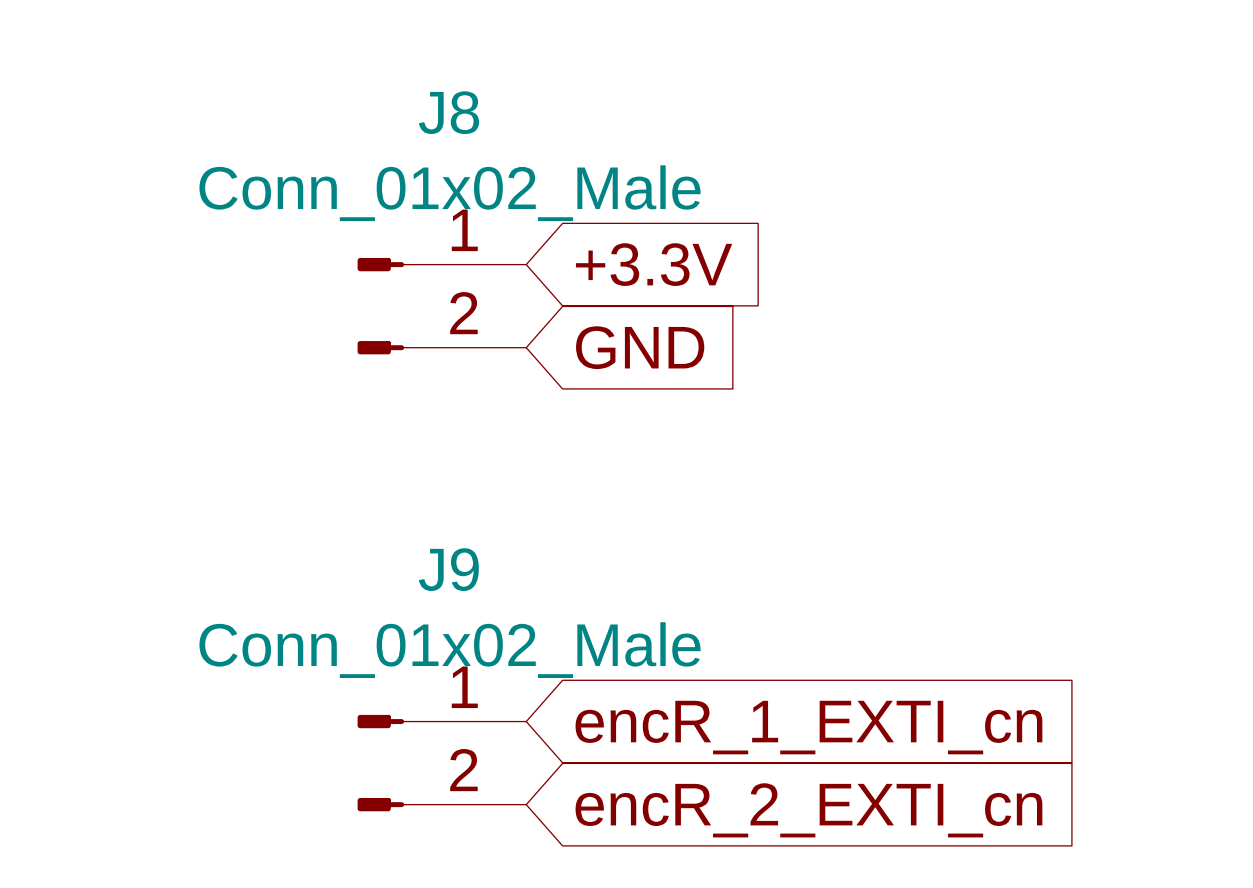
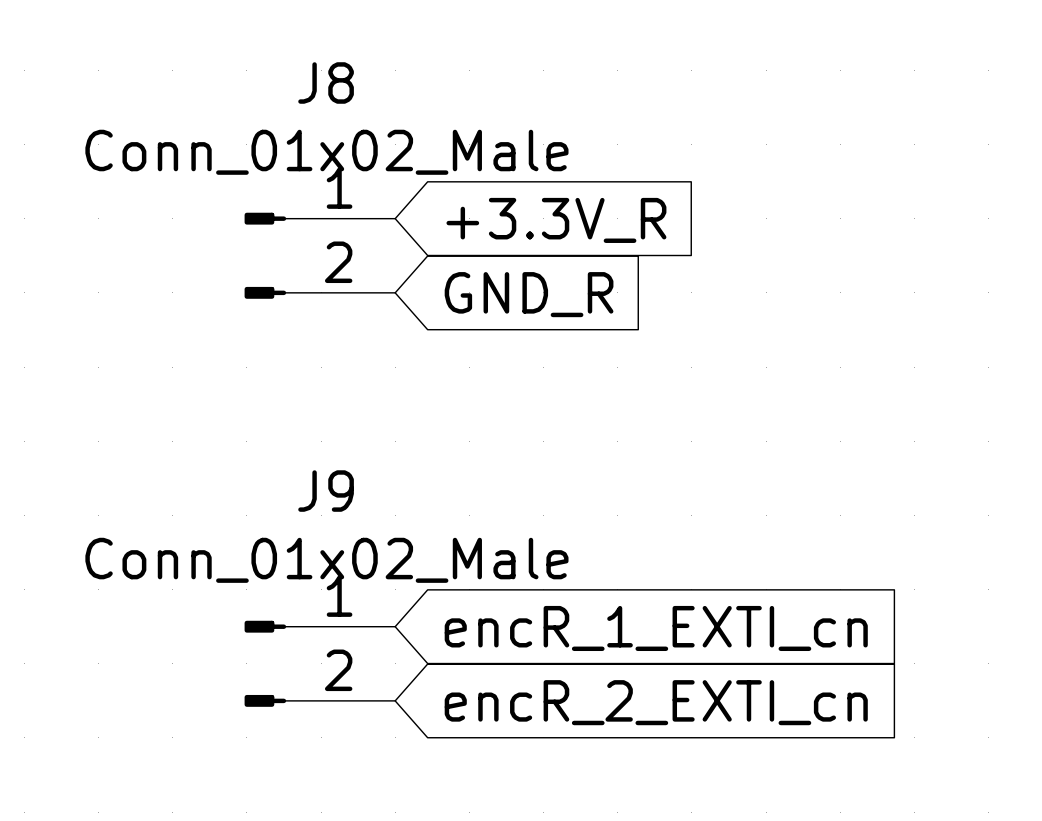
global label: +3.3V (654, 264) -> +3.3V_R (556, 220)
global label: GND (640, 347) -> GND_R (529, 294)

